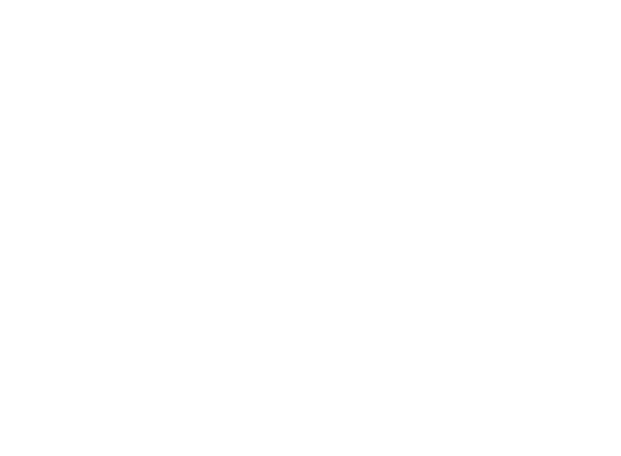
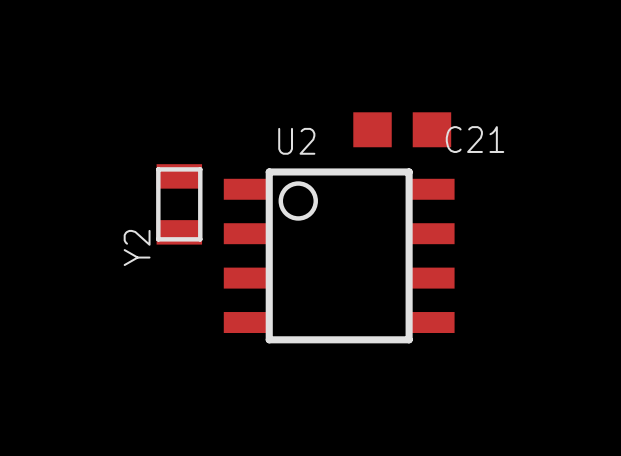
C21: none -> (402, 129)
Y2: none -> (179, 204)
U2: none -> (339, 255)

